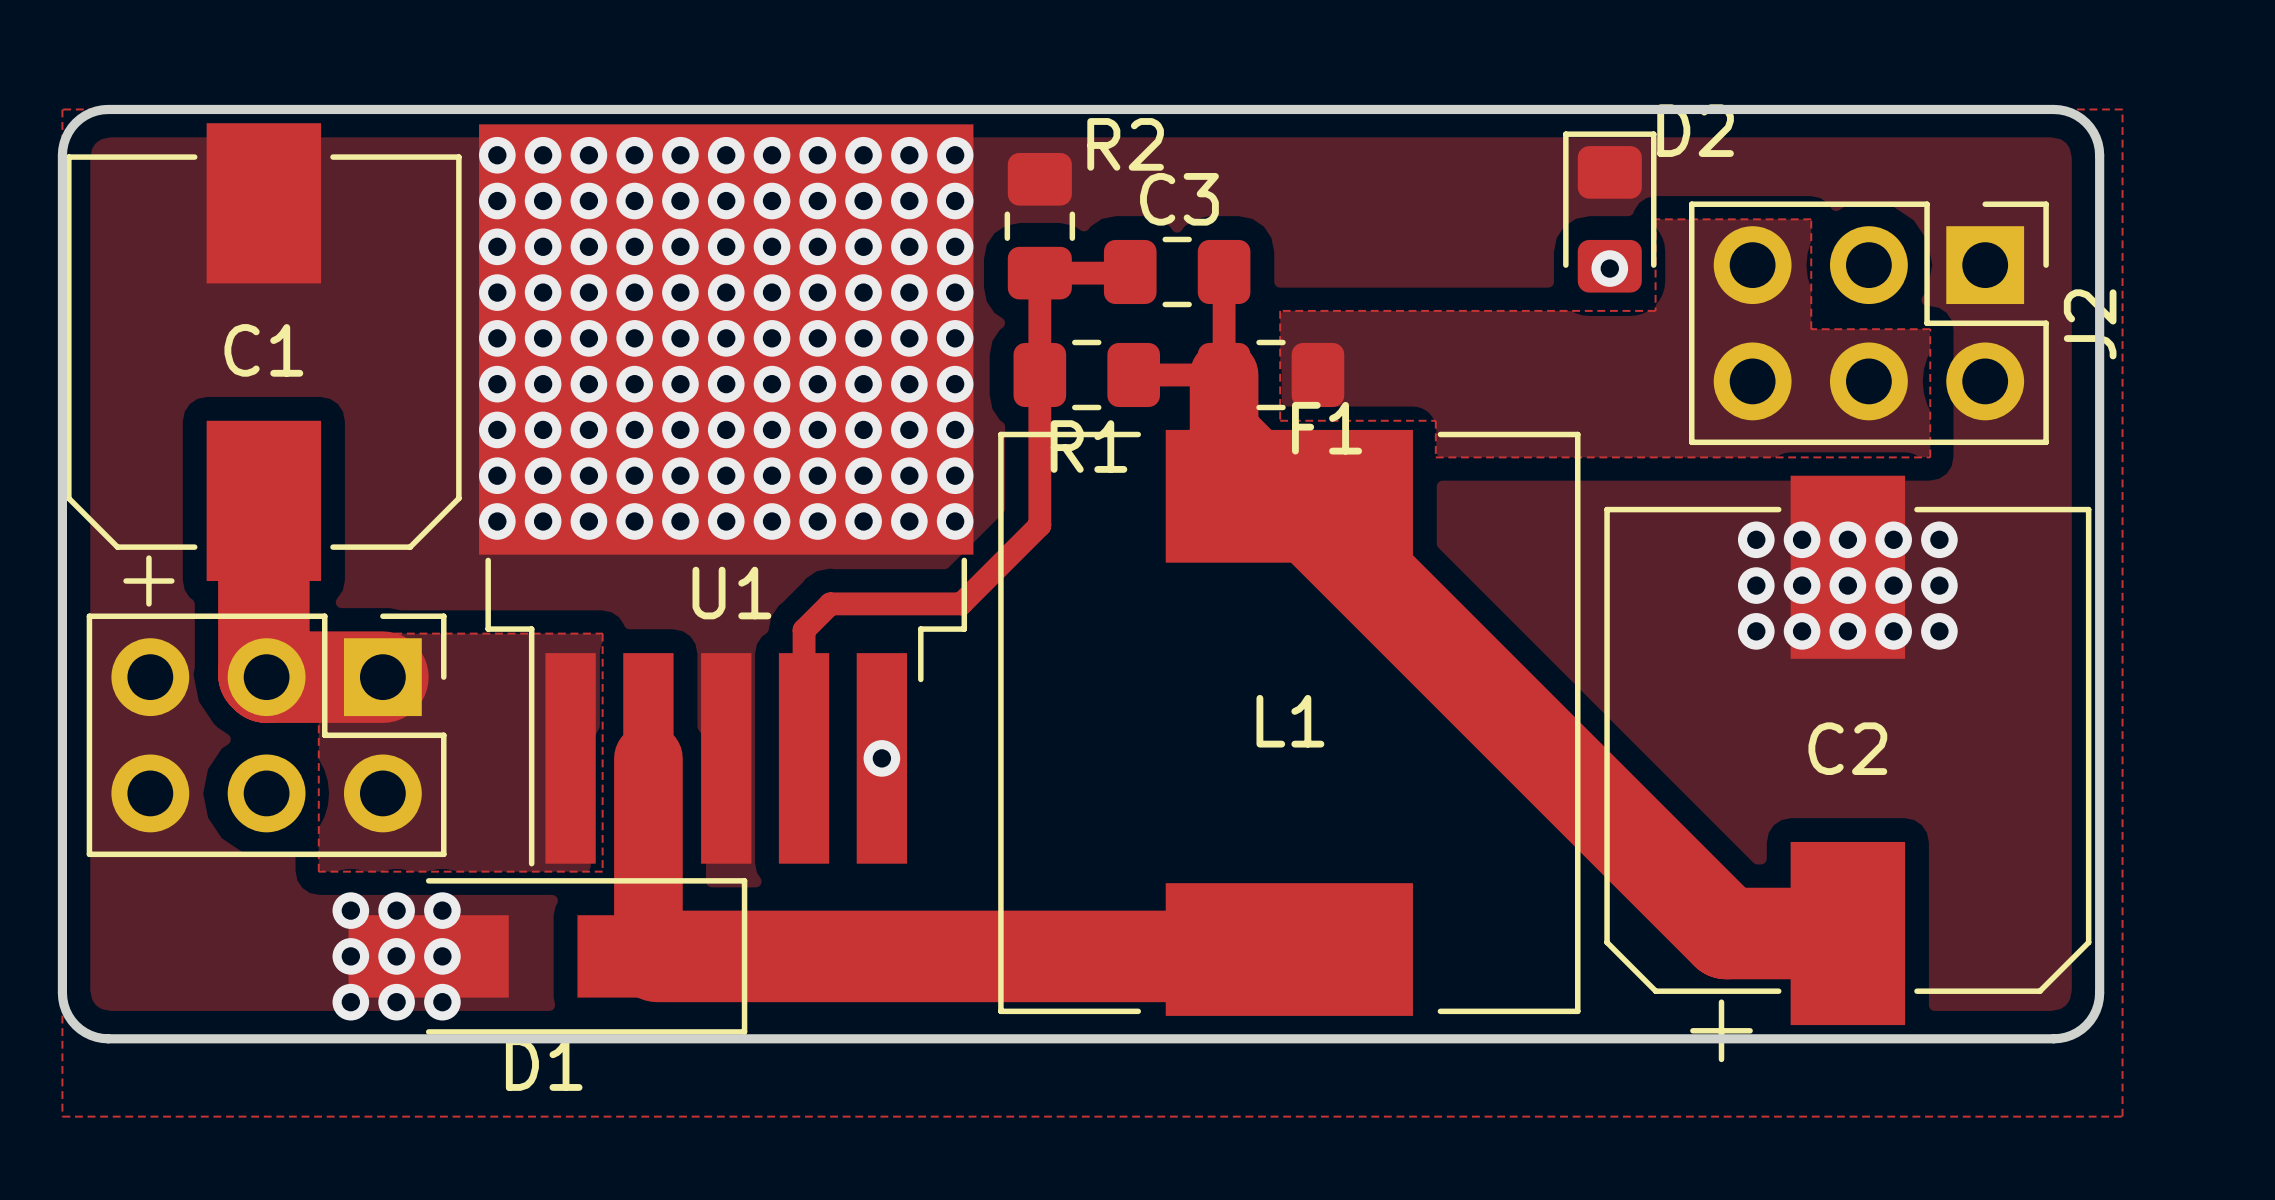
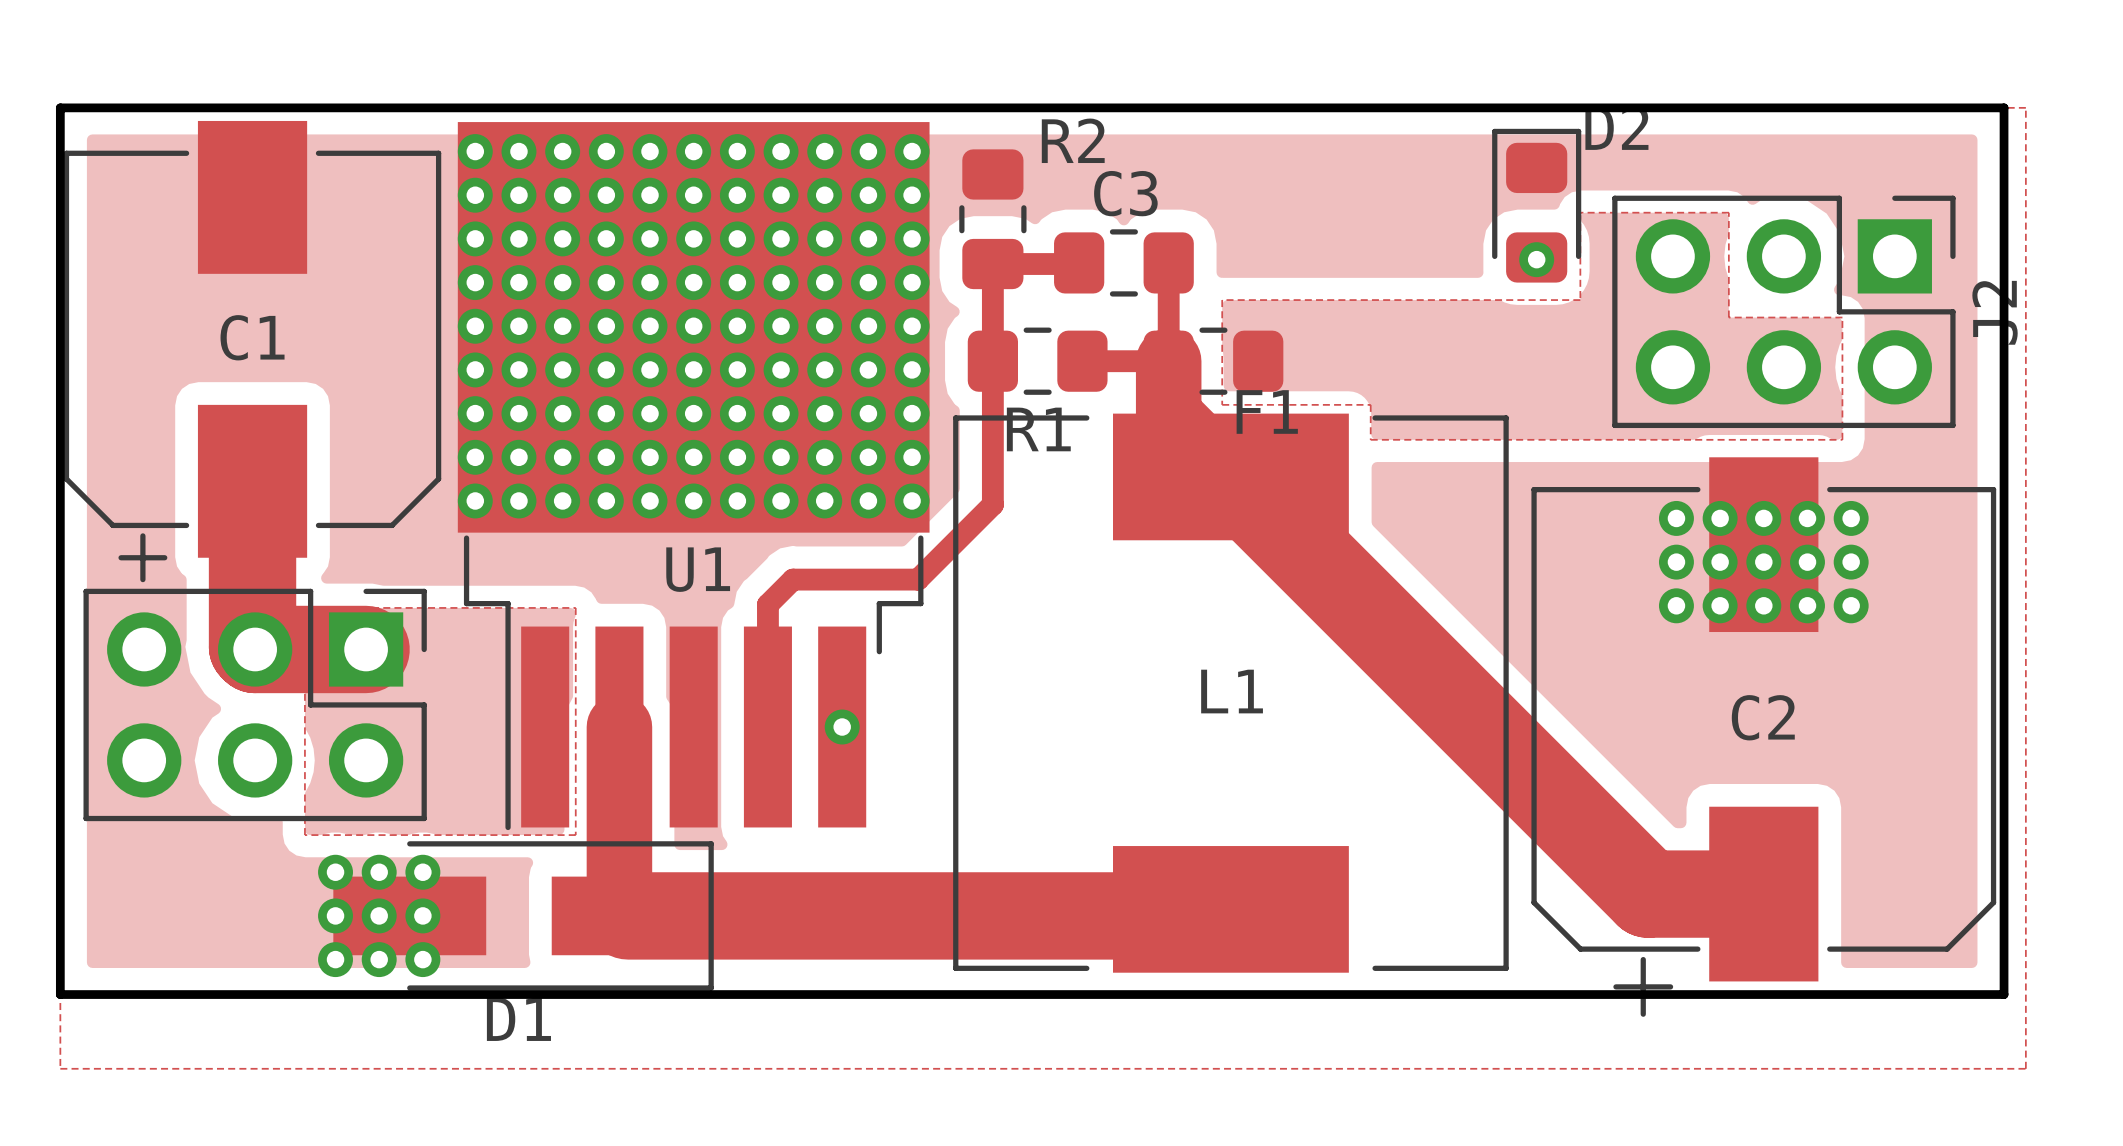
board edge: (108, 109) (90, 112) (75, 122) (65, 137) (62, 155) -> (104, 107) (60, 107) (60, 151)
board edge: (2053, 109) (2071, 112) (2086, 122) (2096, 137) (2099, 155) -> (1960, 107) (2004, 107) (2004, 151)
board edge: (62, 993) (65, 1010) (75, 1025) (90, 1035) (108, 1038) -> (60, 950) (60, 994) (104, 994)
board edge: (2099, 993) (2096, 1010) (2086, 1025) (2071, 1035) (2053, 1038) -> (2004, 950) (2004, 994) (1960, 994)

